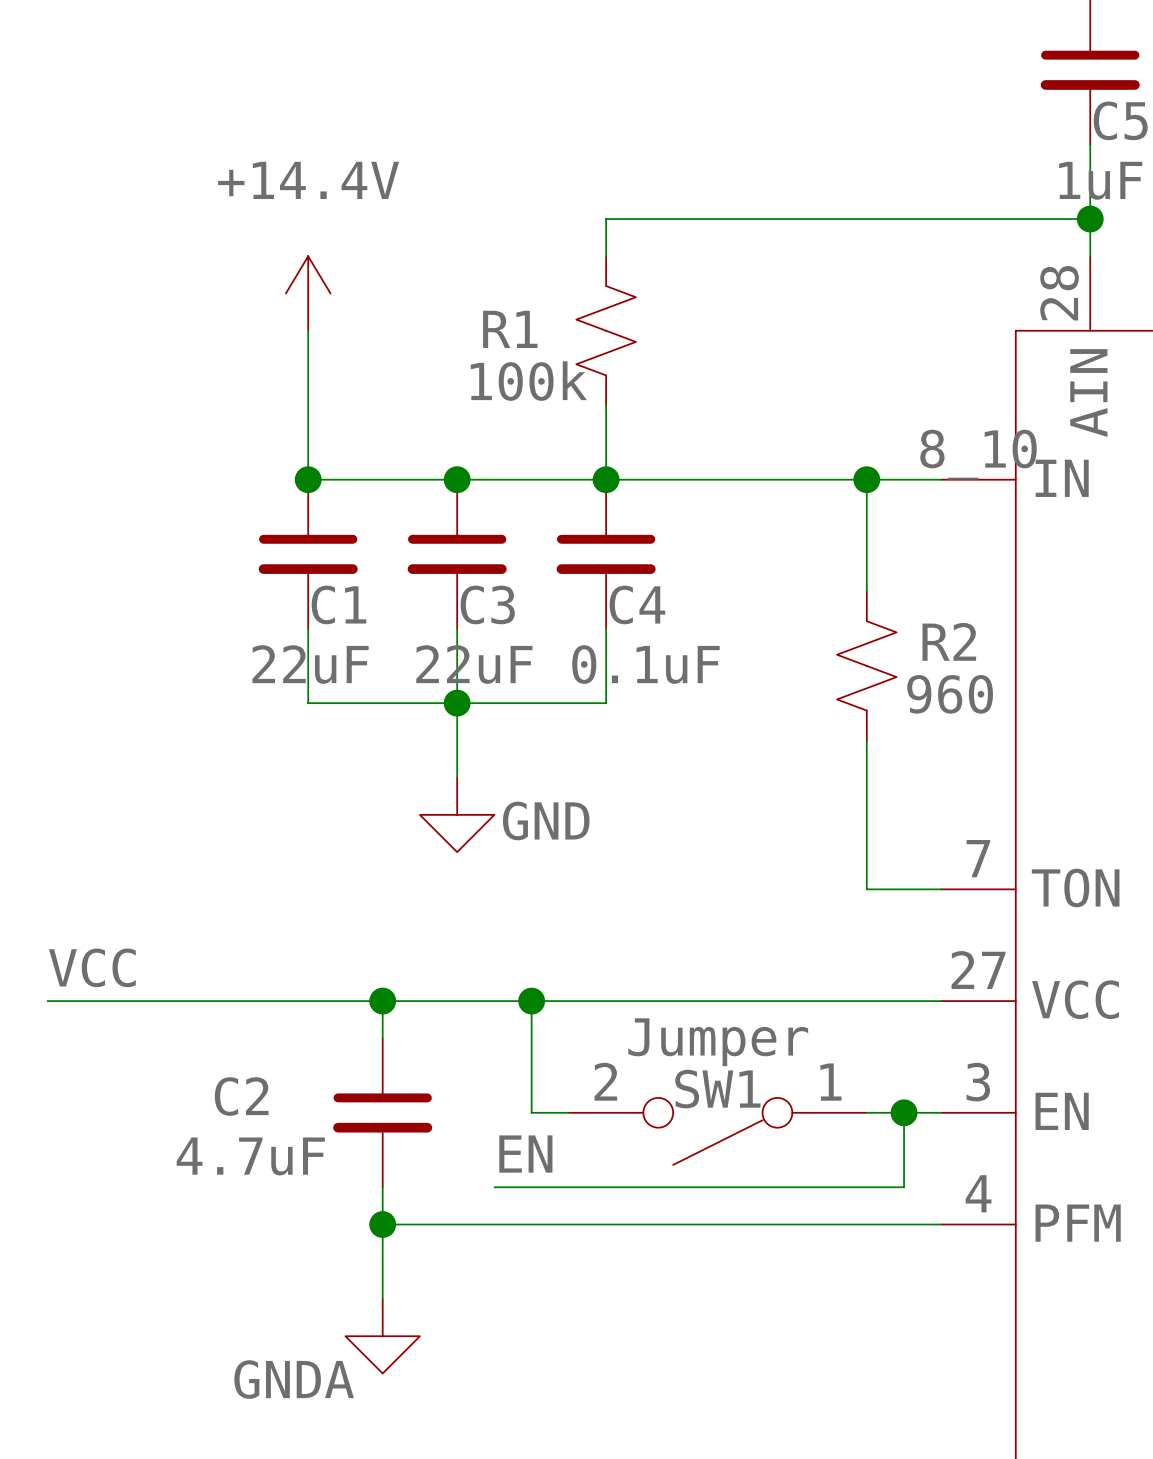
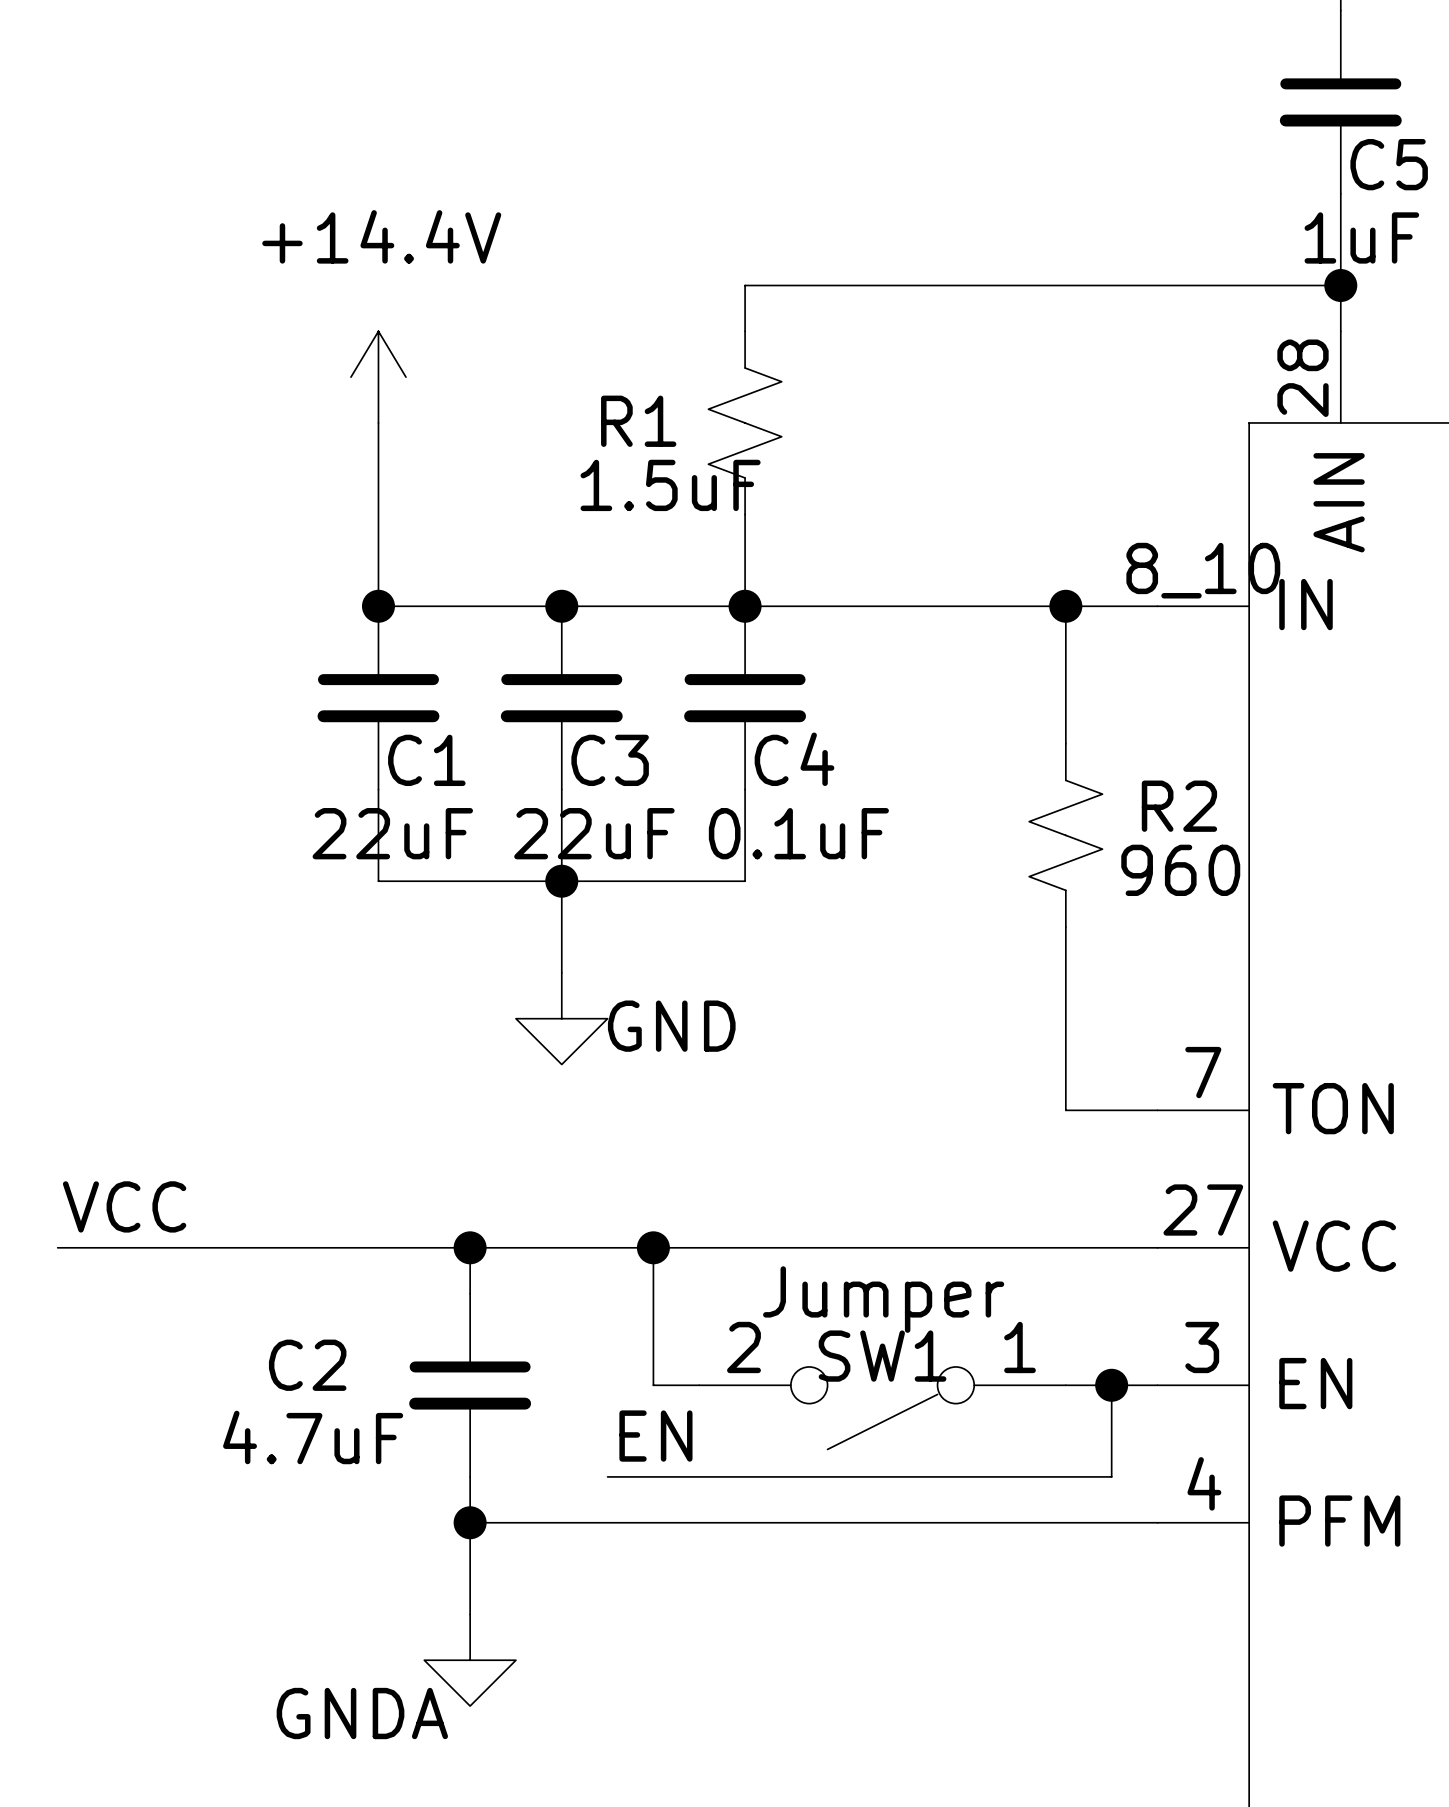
R1 value: 100k (528, 381) -> 1.5uF (670, 485)

